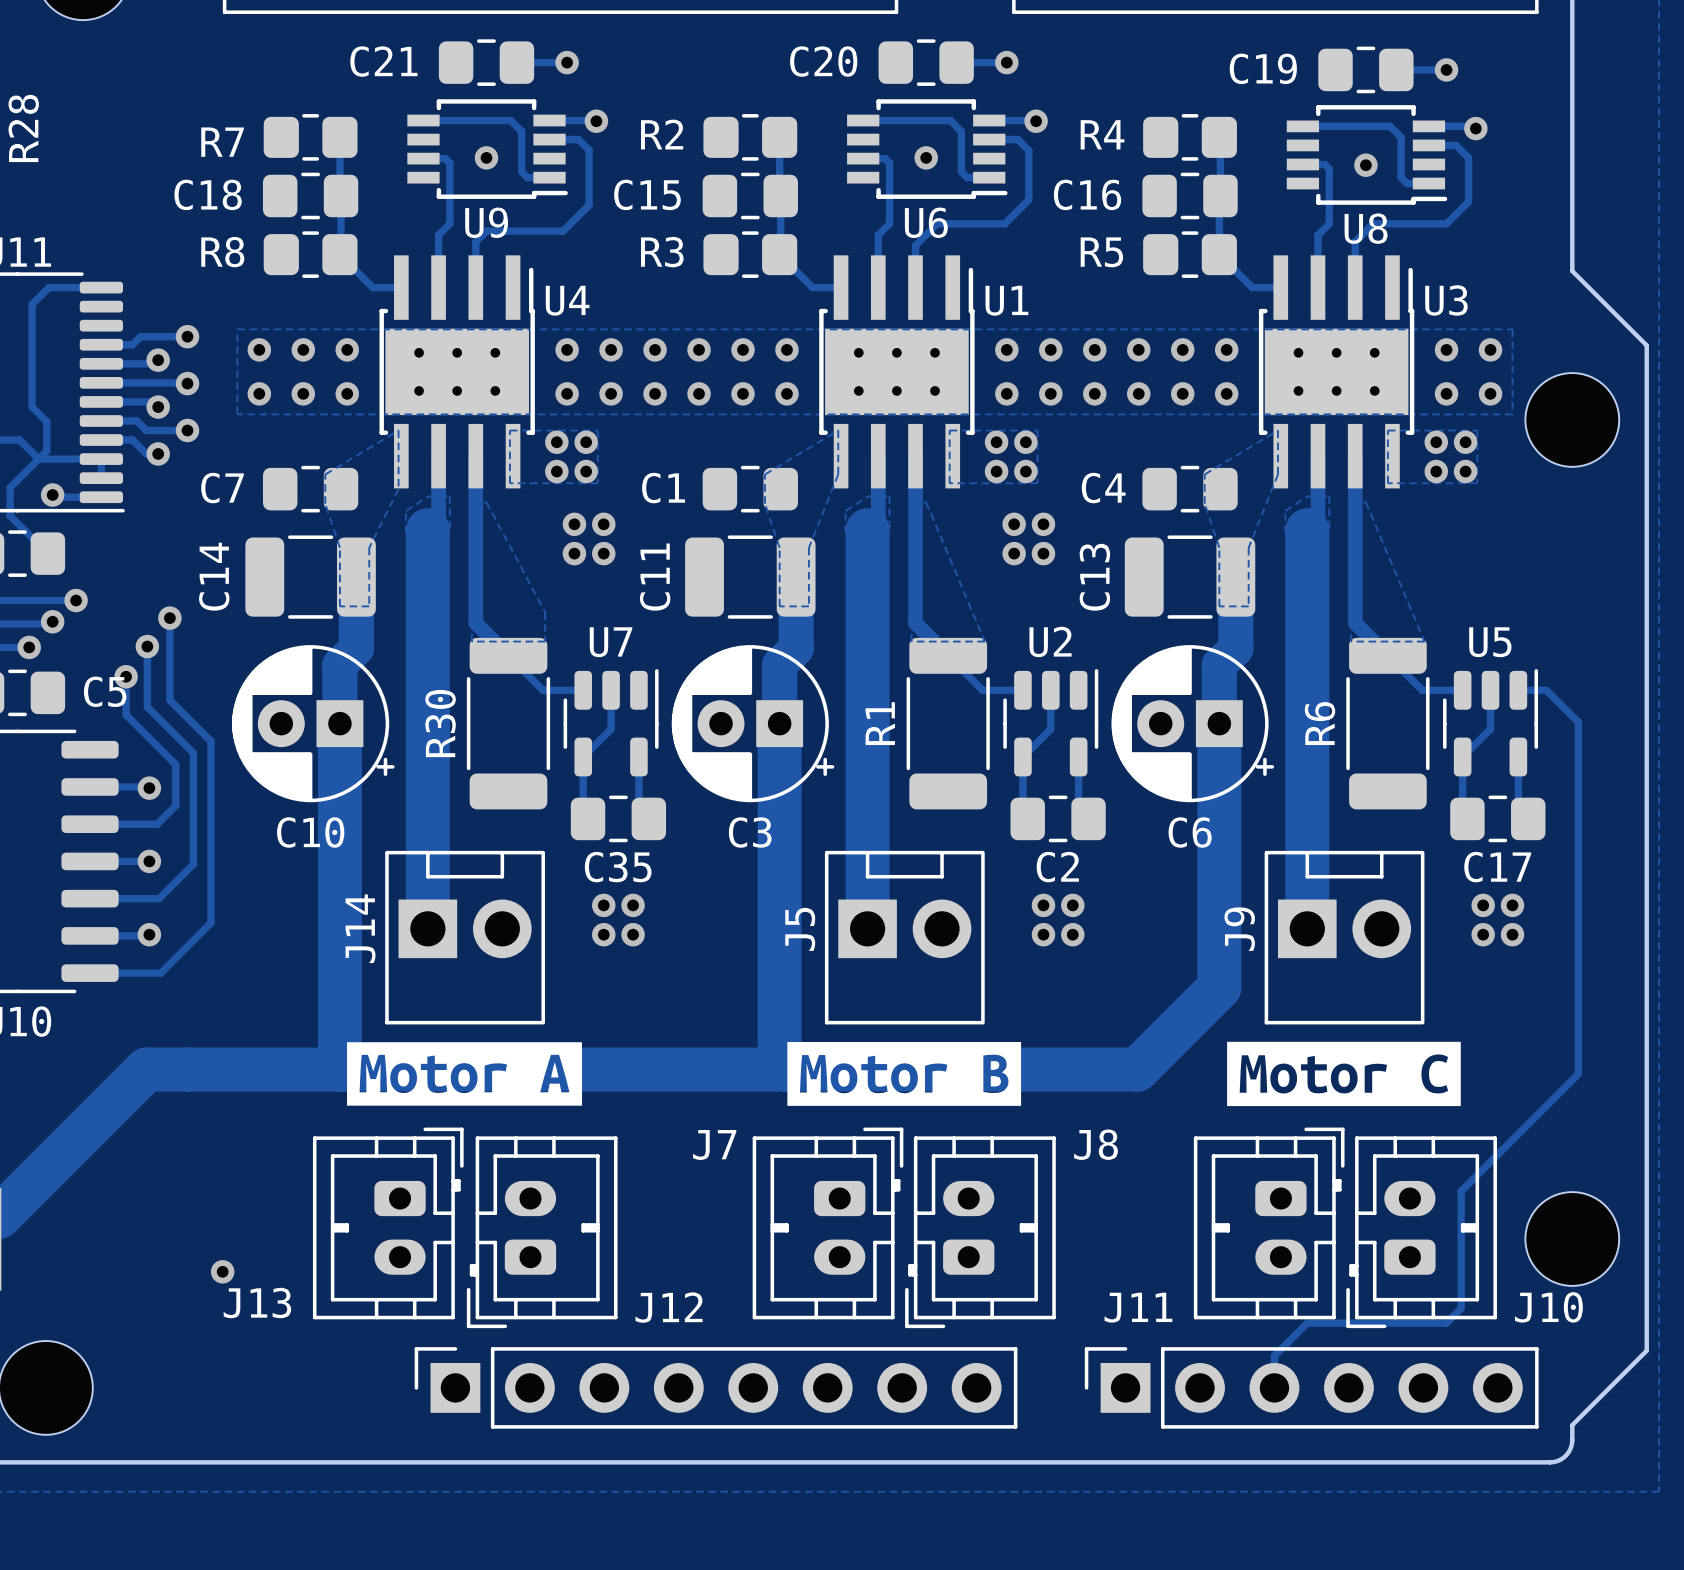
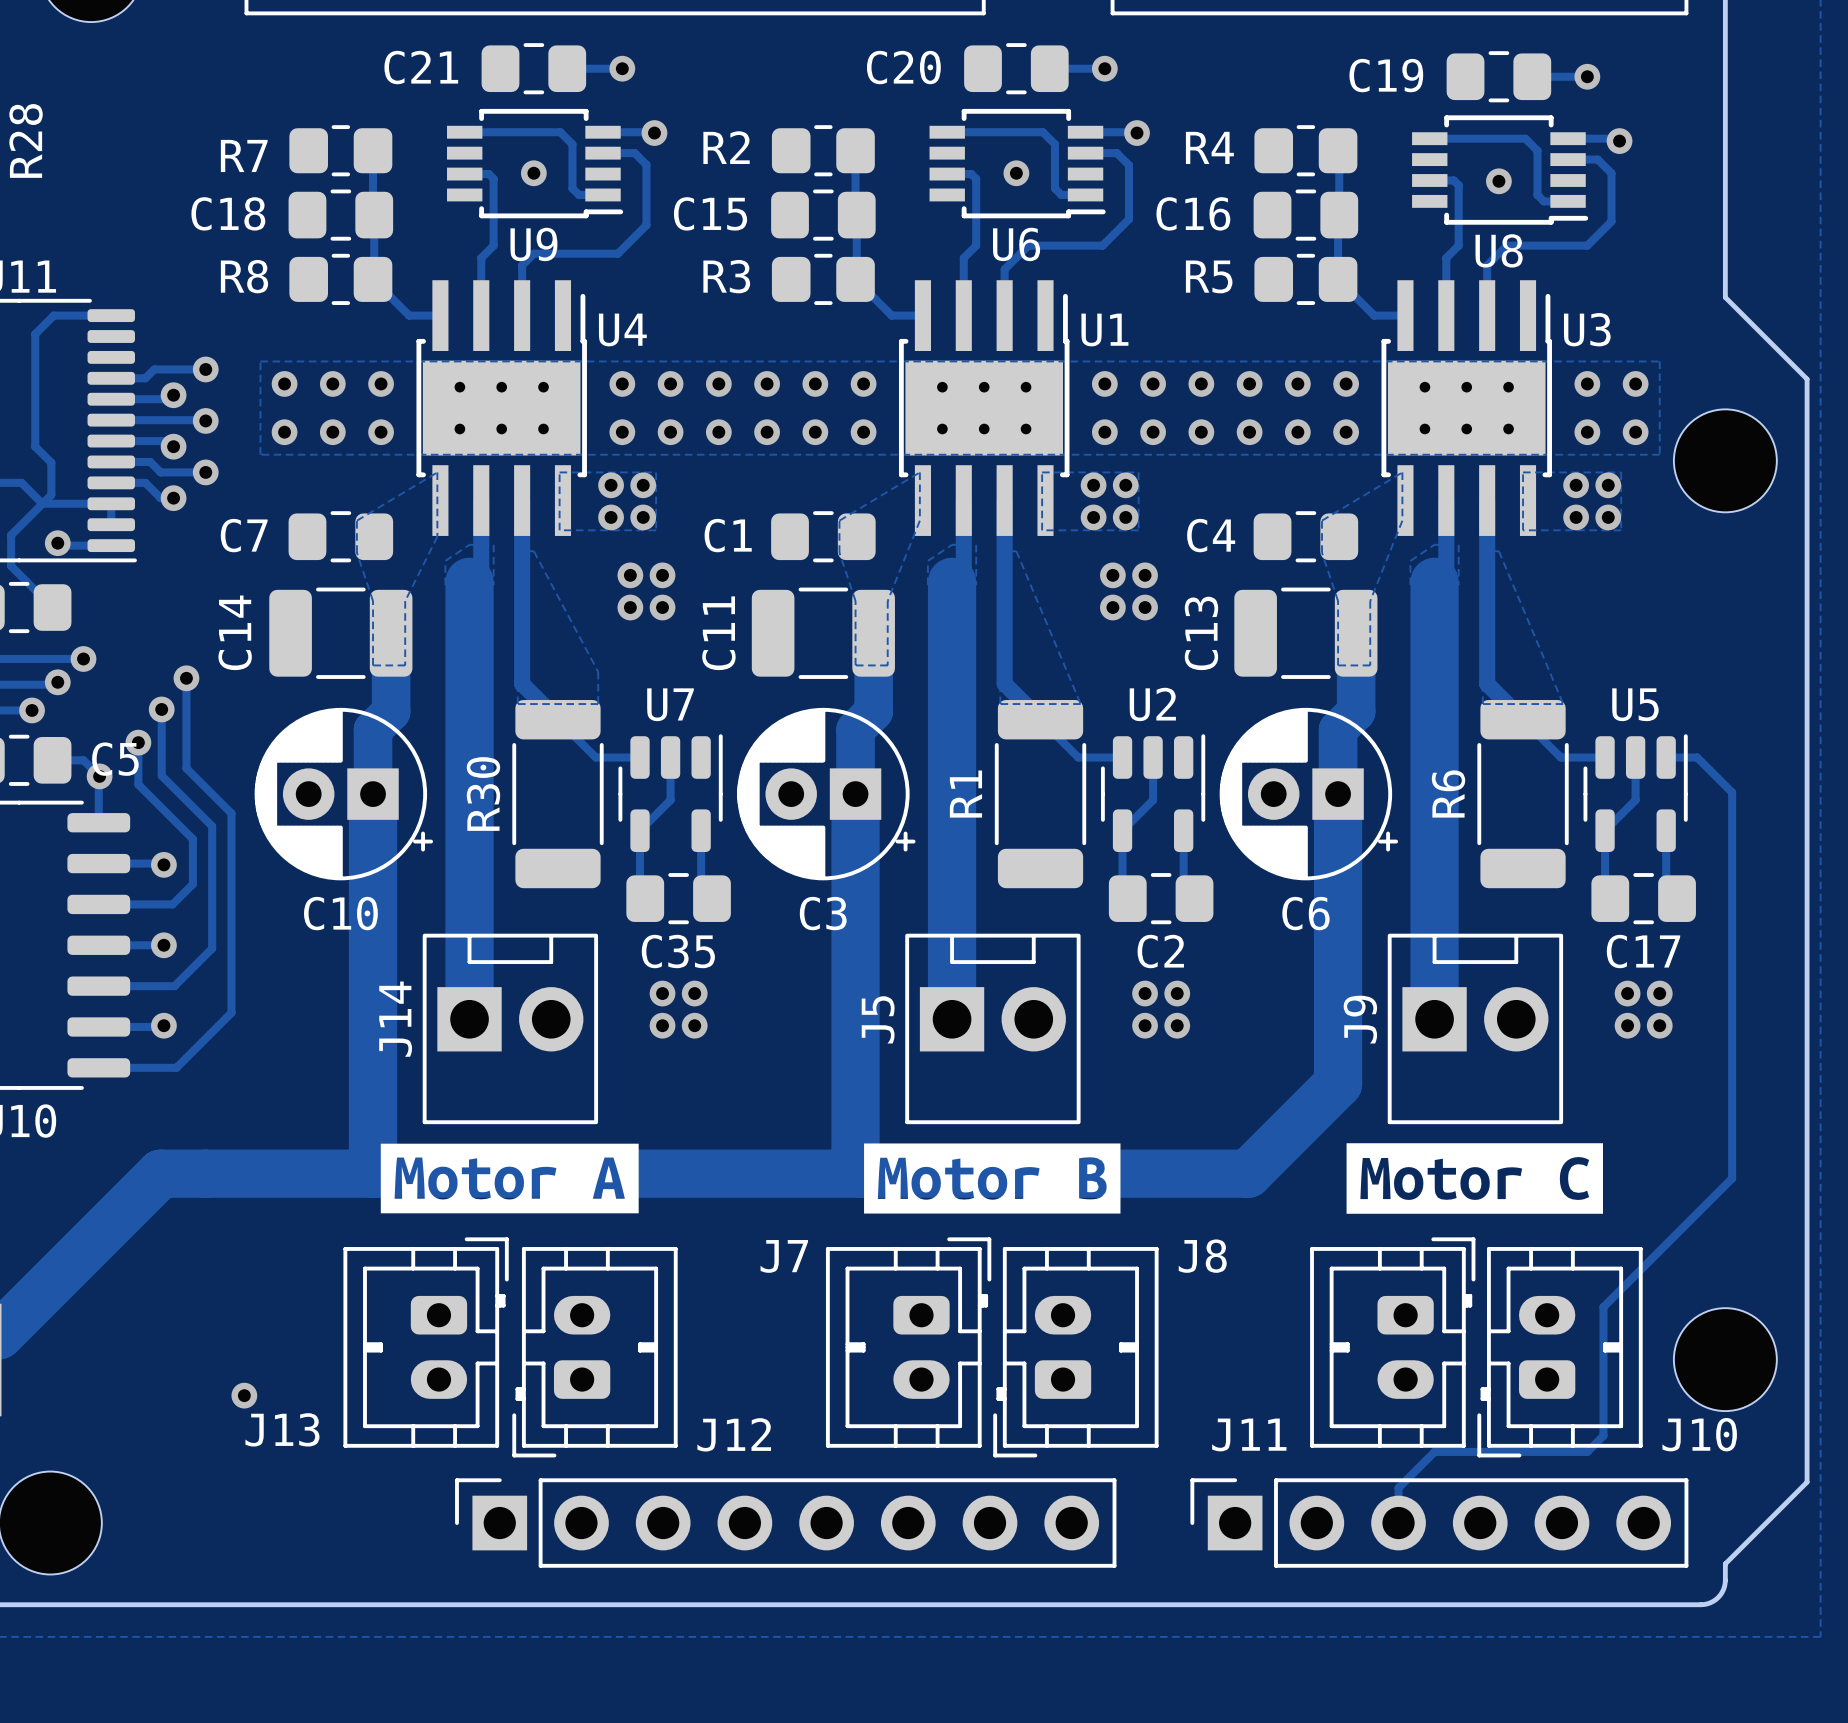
track: none -> (52, 760) (83, 760) (99, 776) (98, 822)
via: none -> (99, 776)

